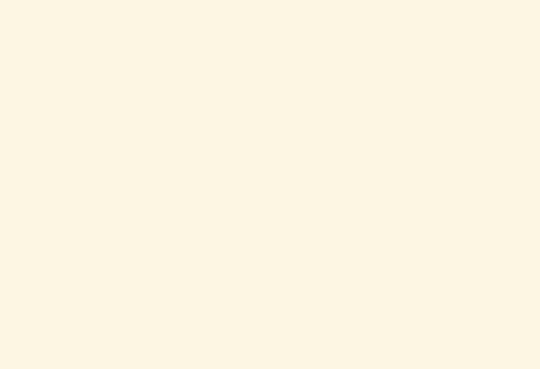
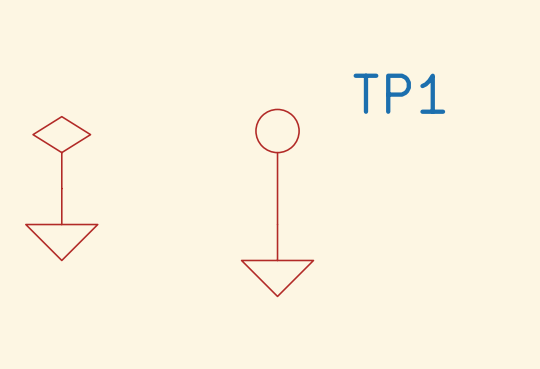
power symbol: none -> (61, 152)
TP1: none -> (277, 166)
power symbol: none -> (61, 224)
power symbol: none -> (277, 260)

